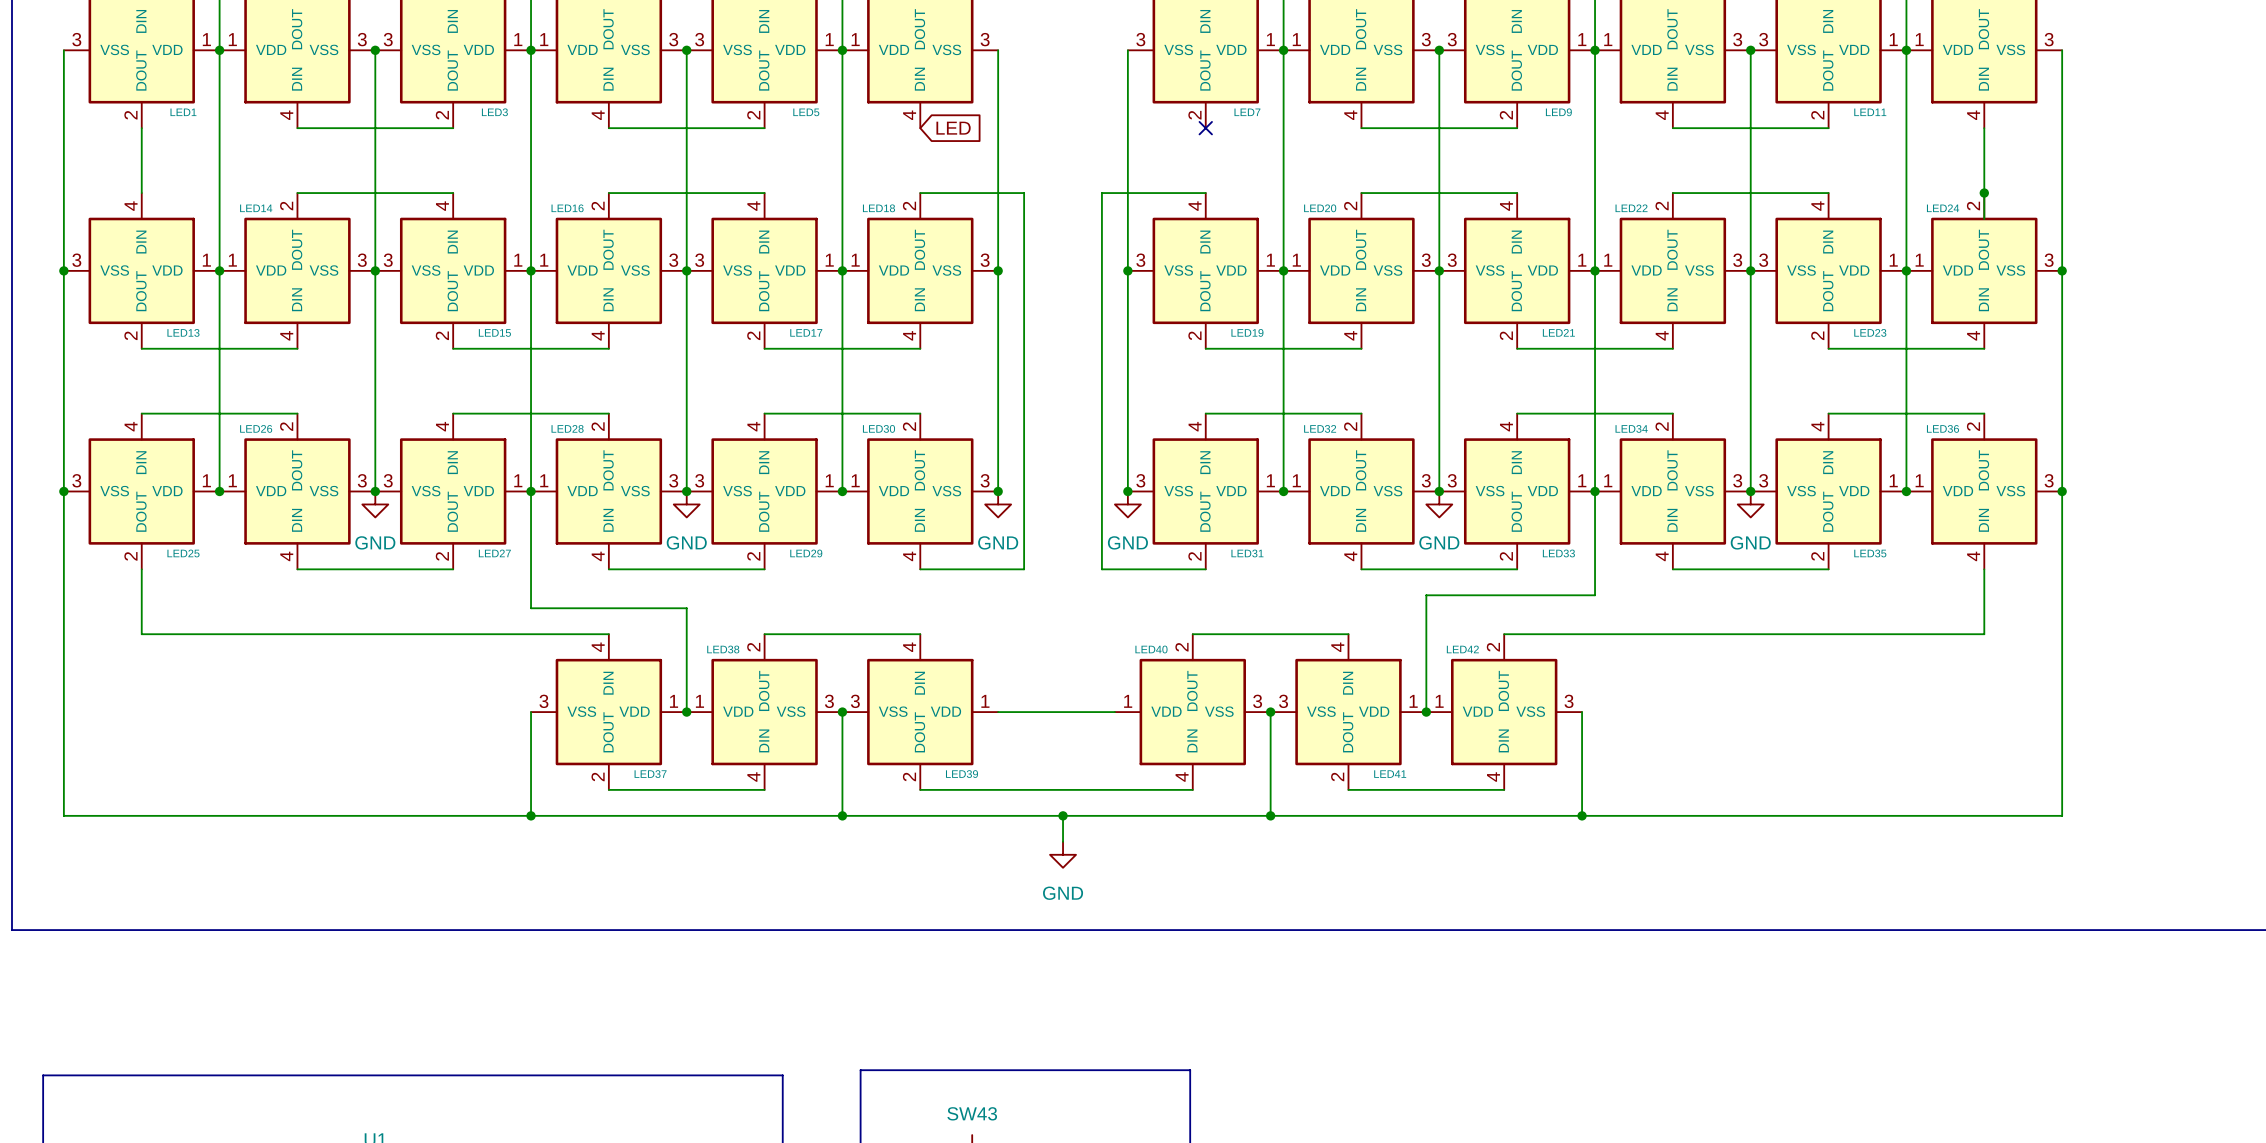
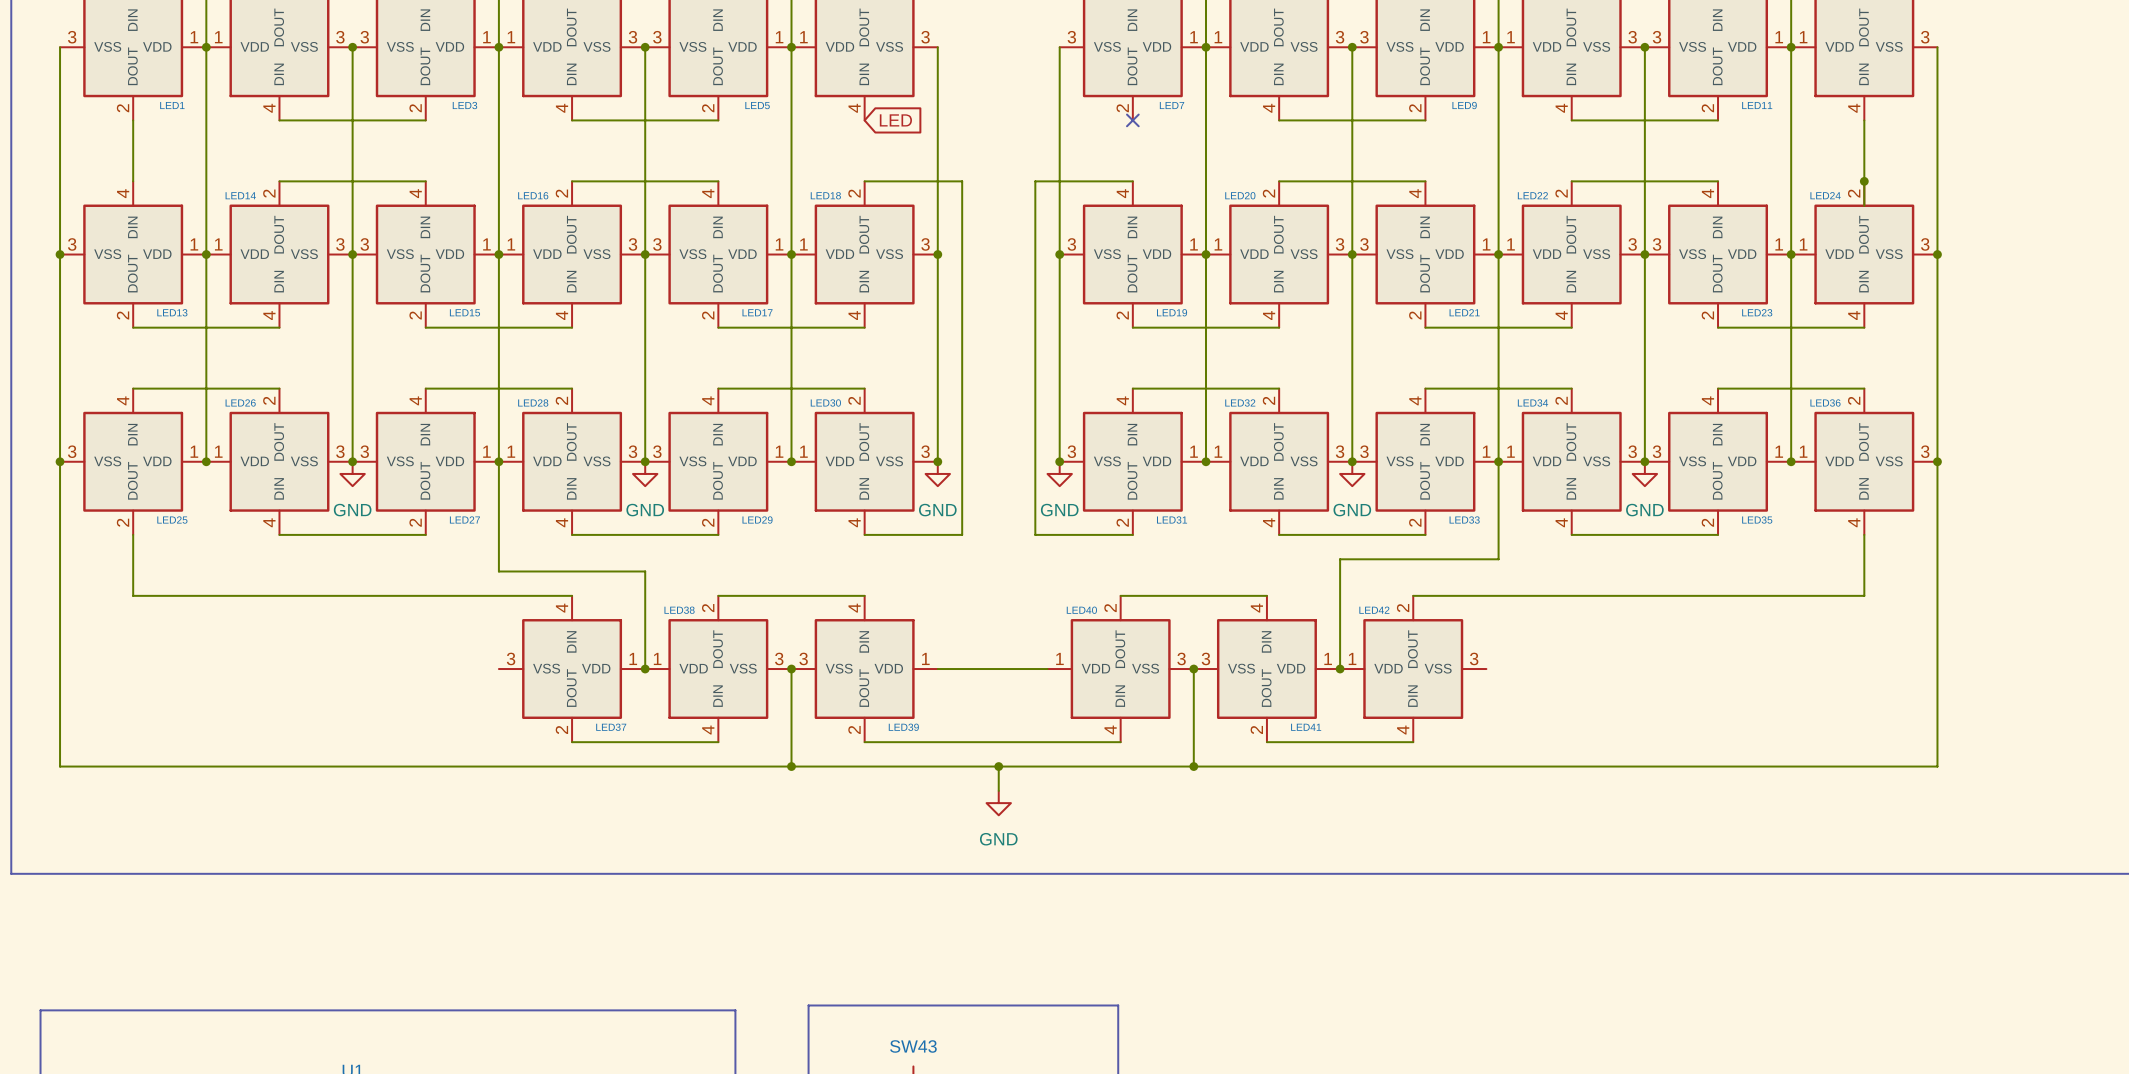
wire: (531, 712) (531, 815) -> none
wire: (1582, 712) (1582, 815) -> none
junction: (531, 815) -> none
junction: (1582, 815) -> none

